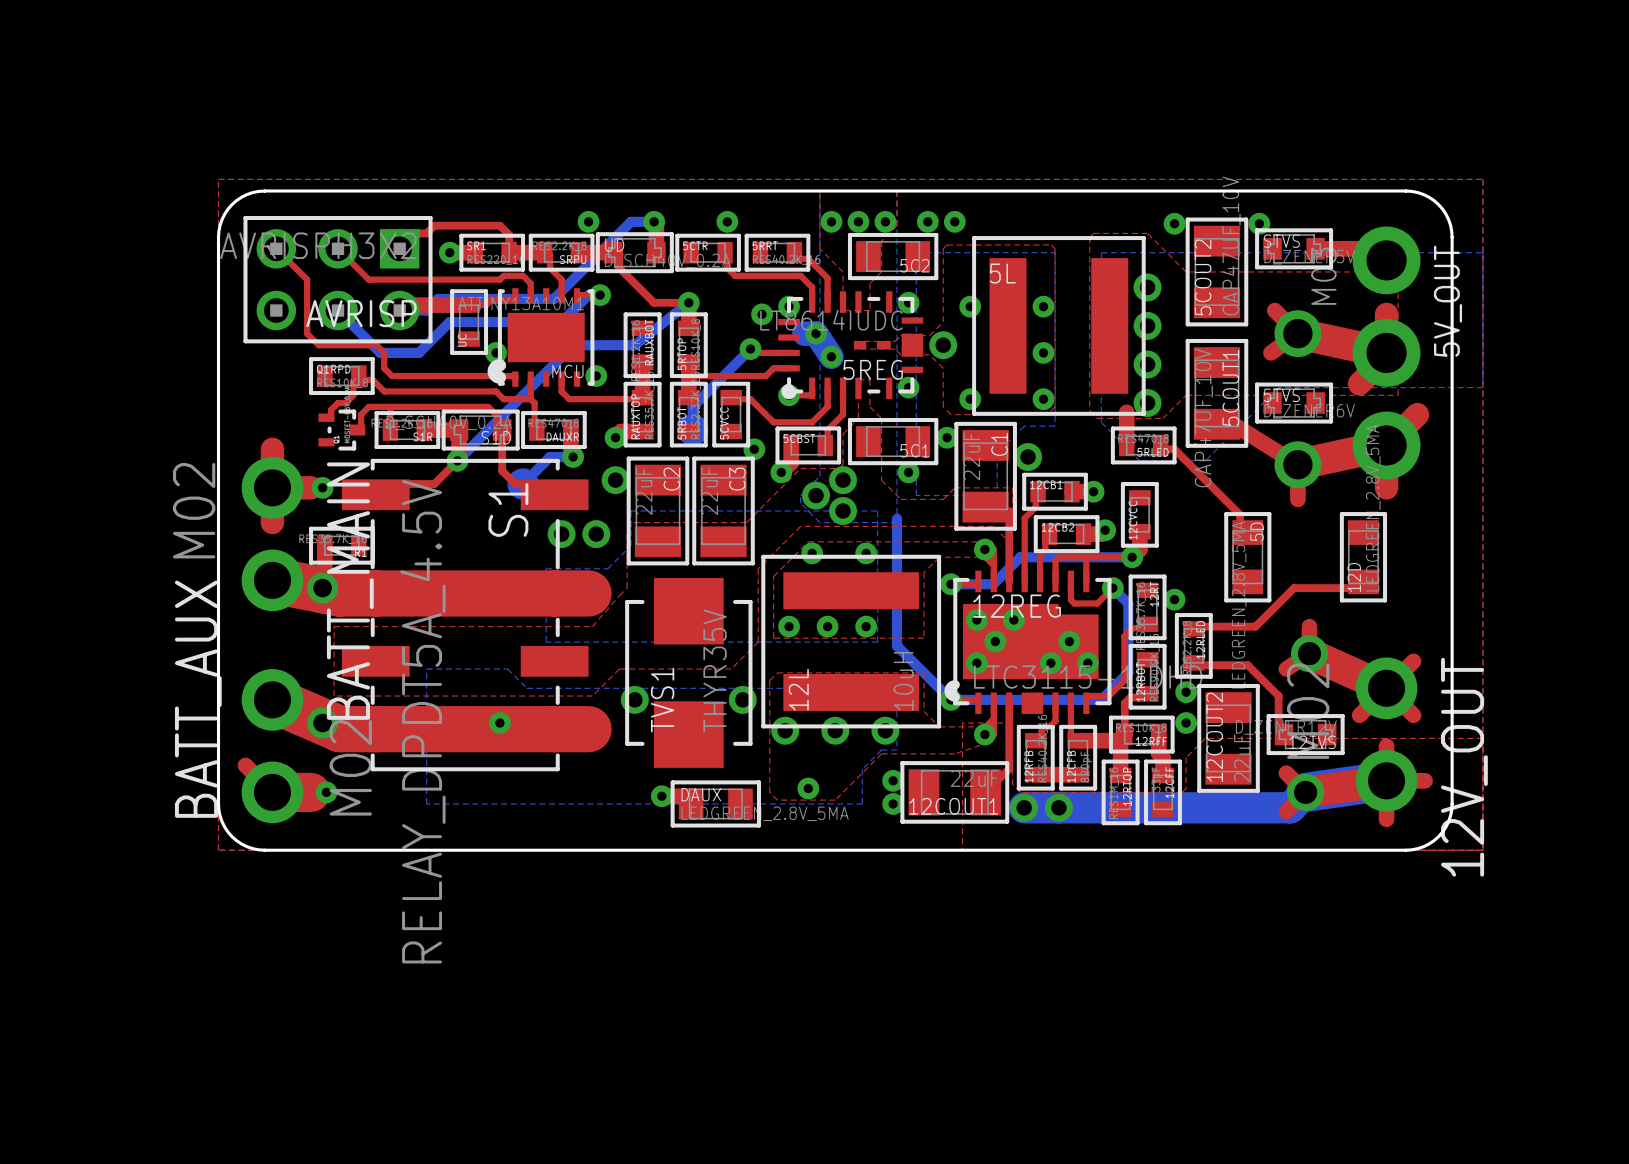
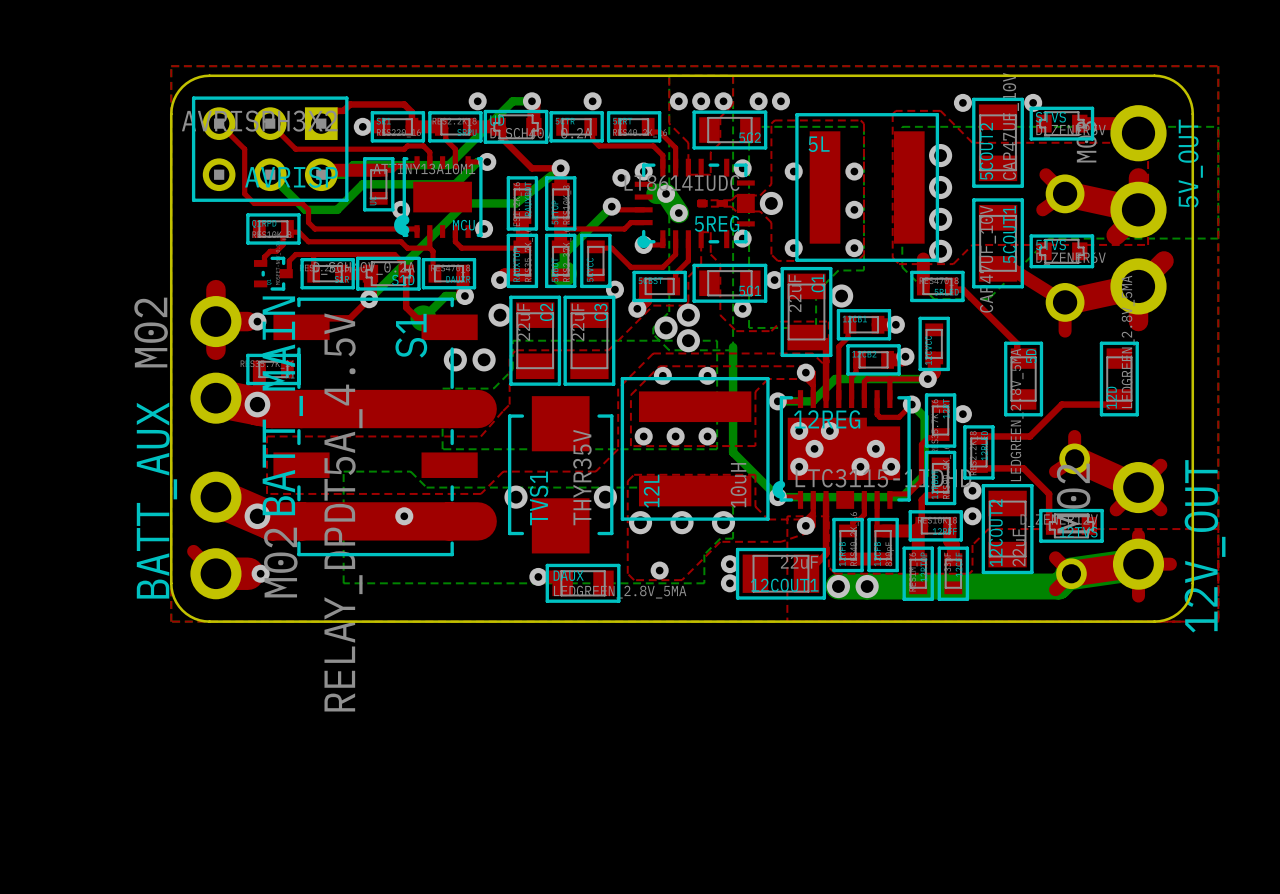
MCU footprint: [487, 288, 595, 387] -> [394, 156, 483, 238]

